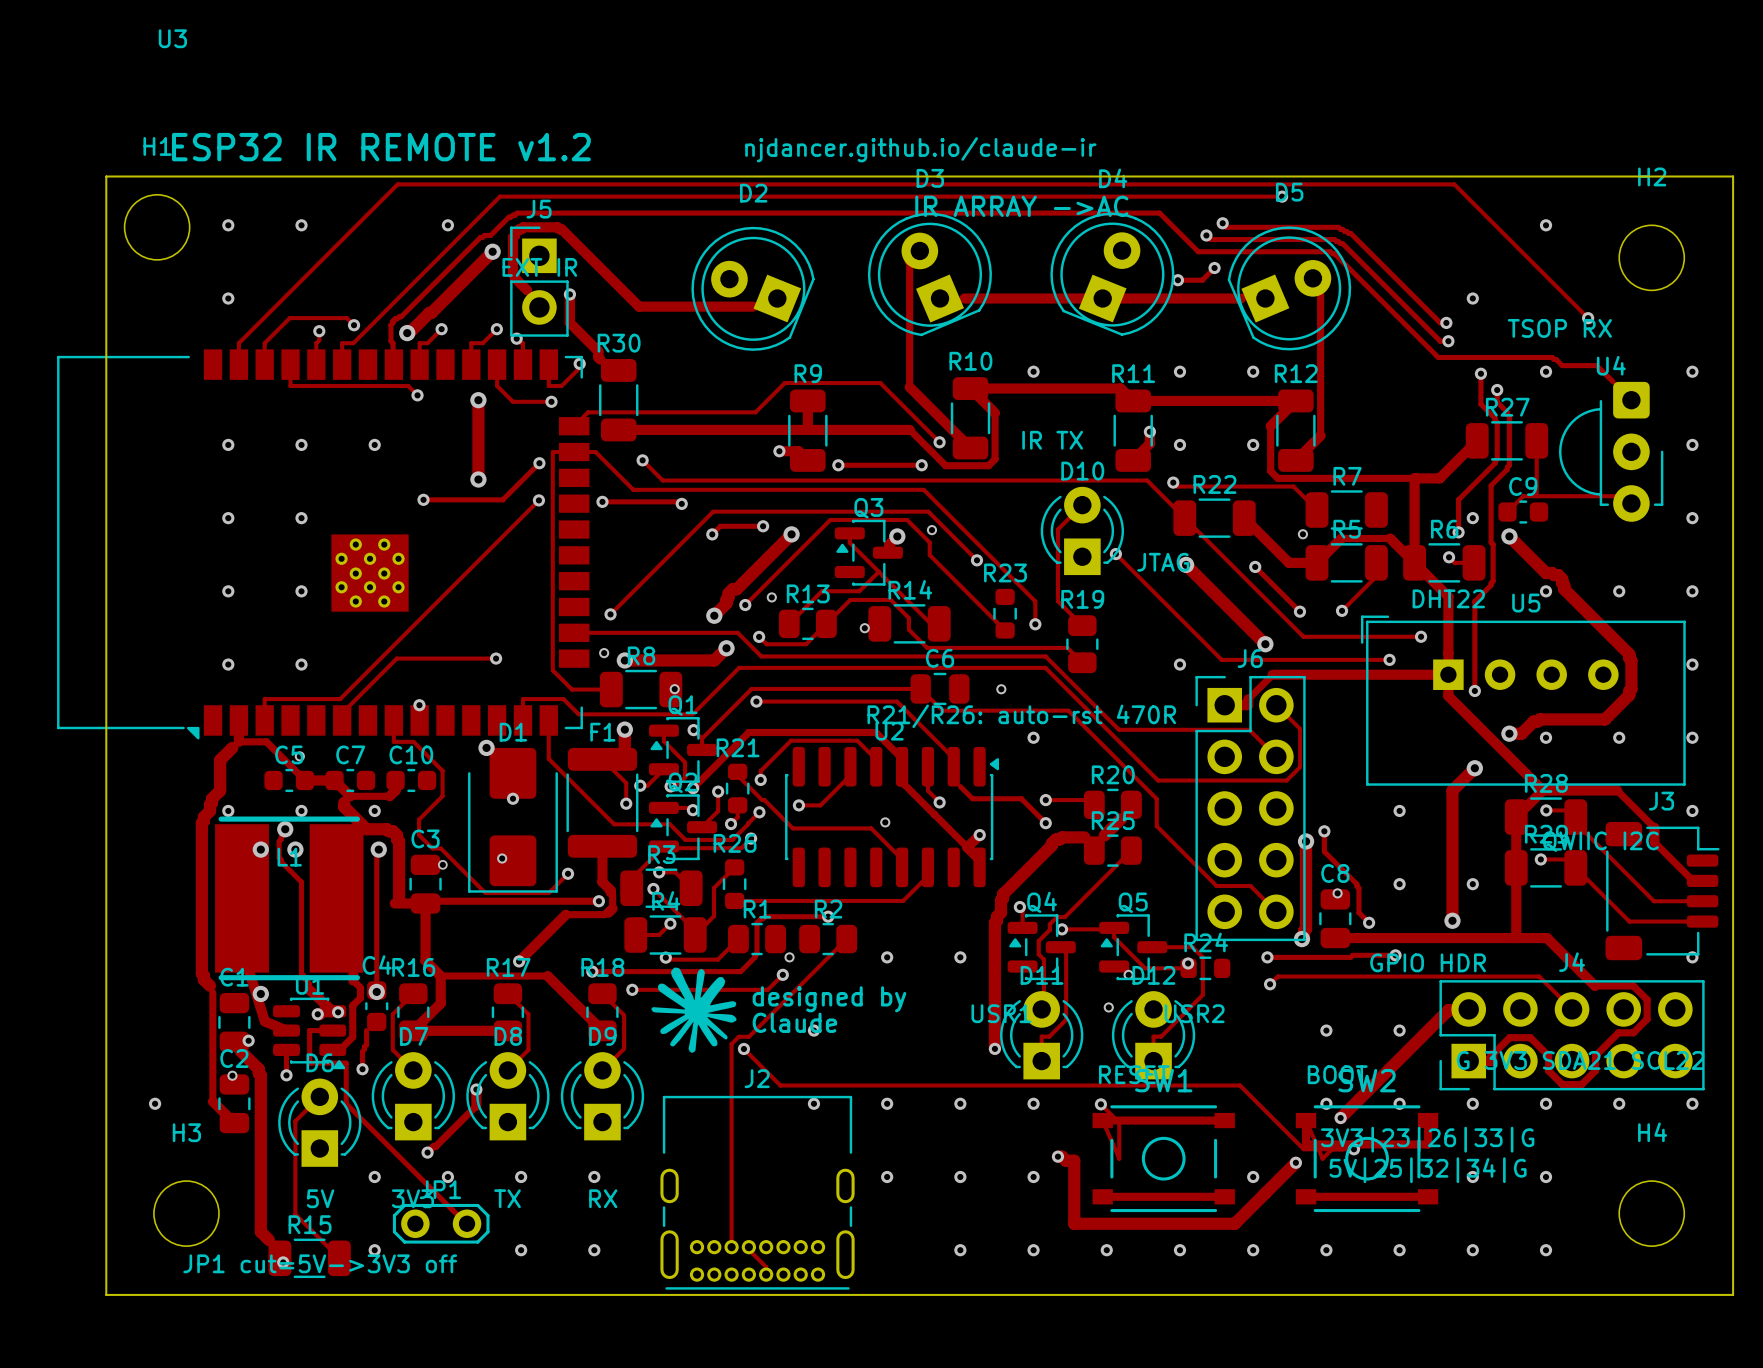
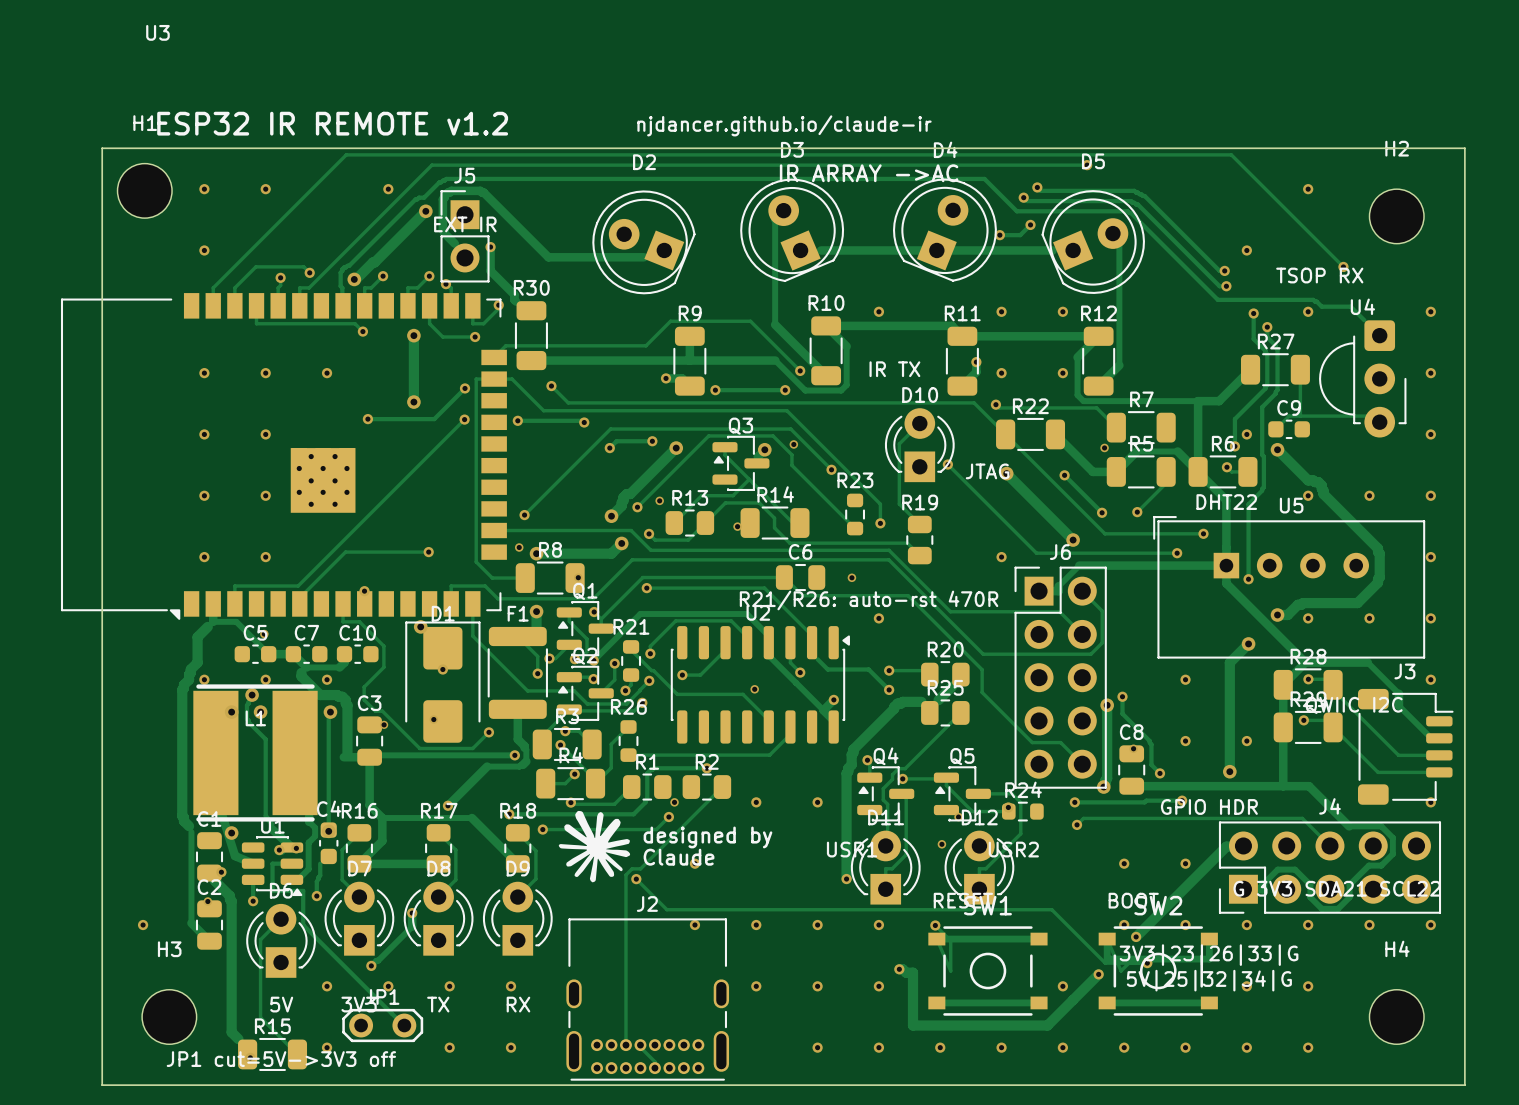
D1 rotation: 0° (512, 820) -> 180° (442, 682)

